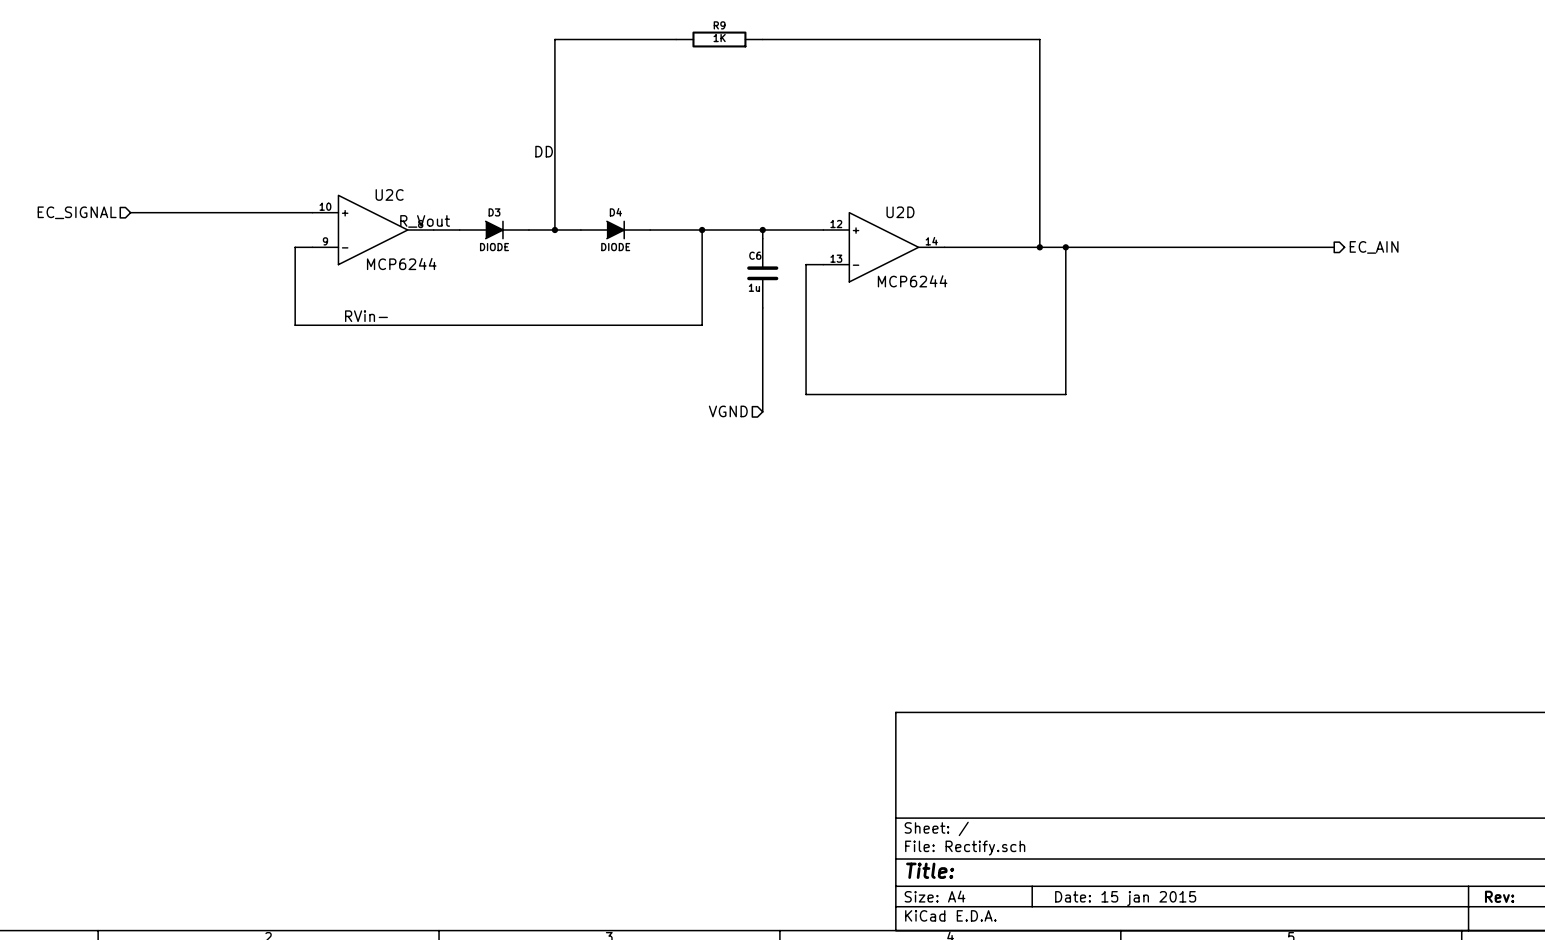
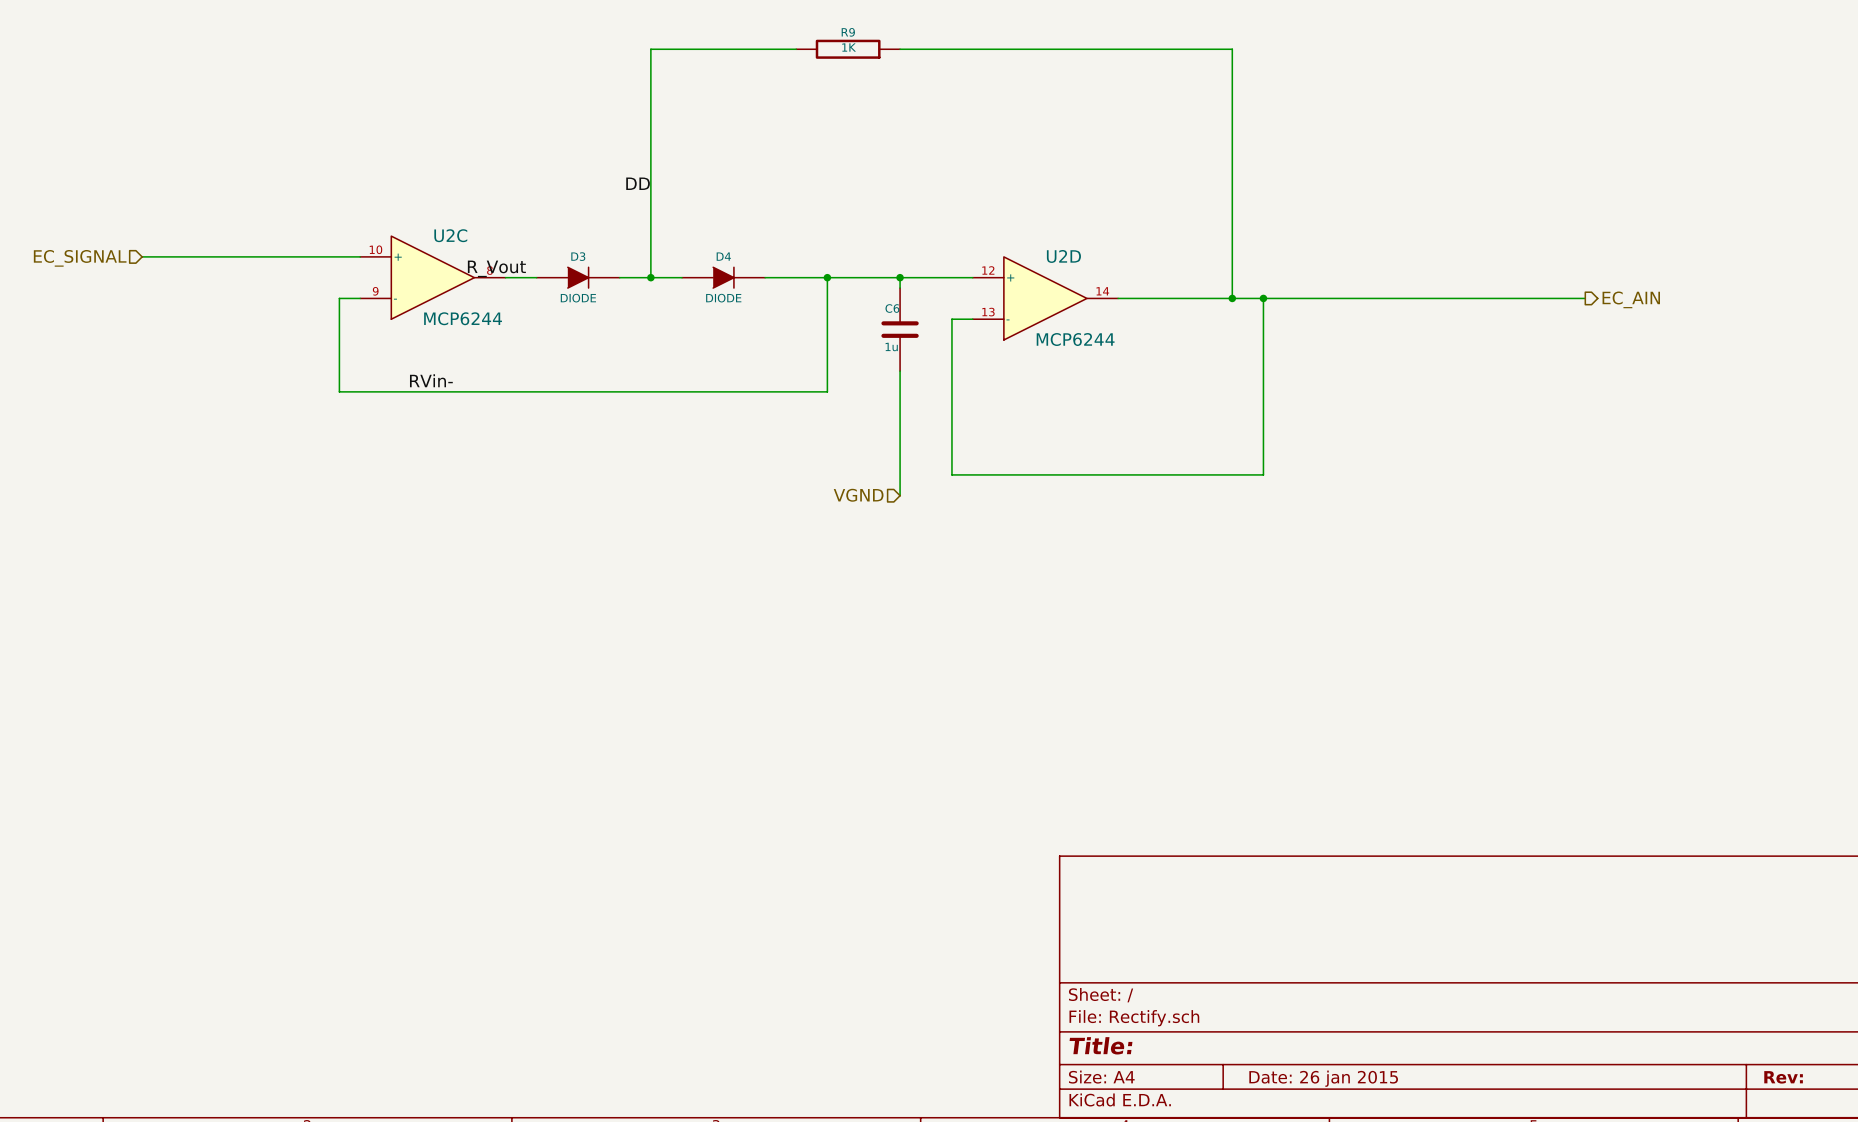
title block: Date: 15 jan 2015 (1125, 898) -> Date: 26 jan 2015 (1323, 1078)

